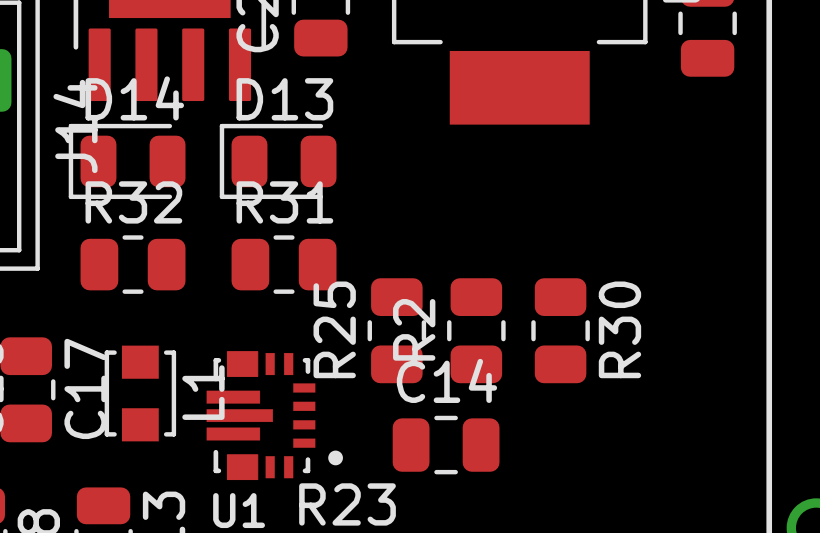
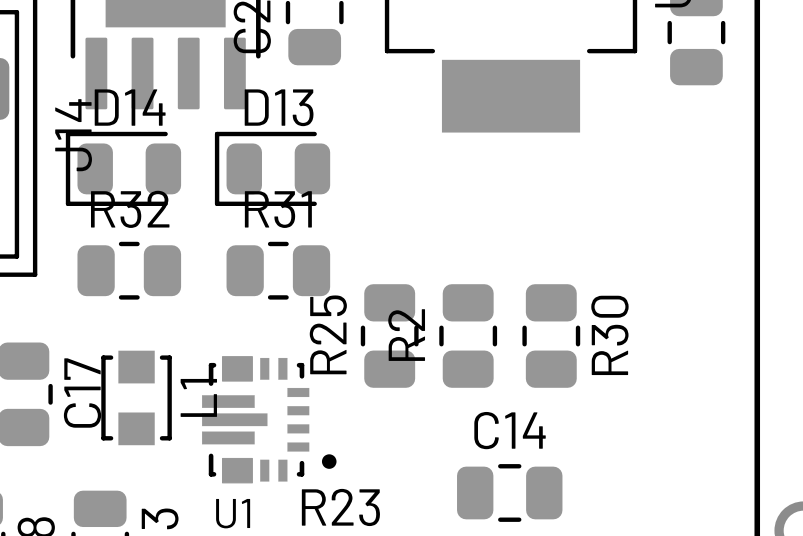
C14 position: (446, 445) -> (509, 492)

